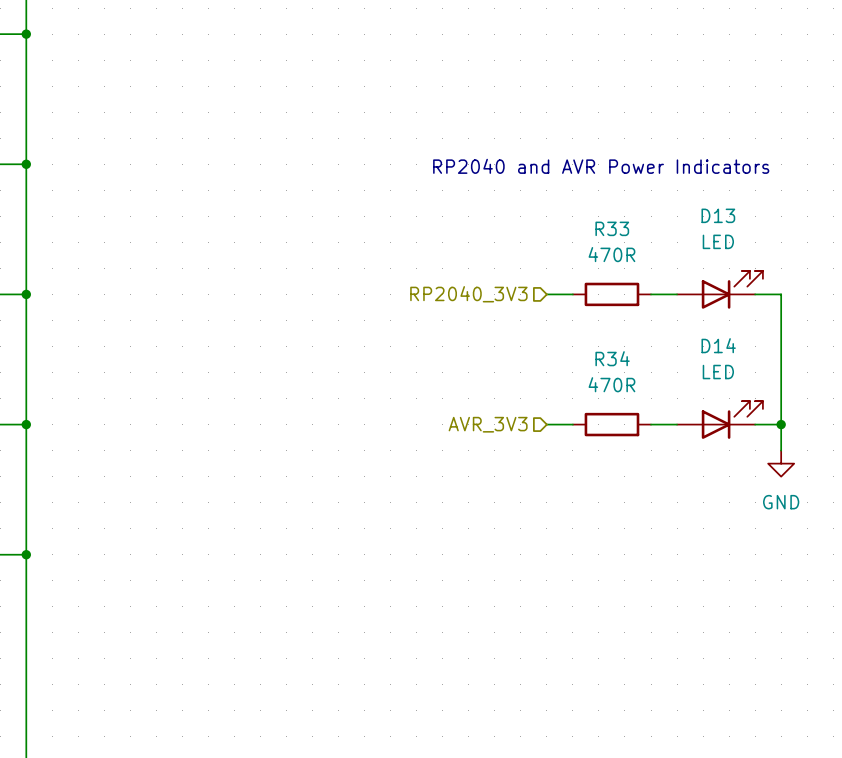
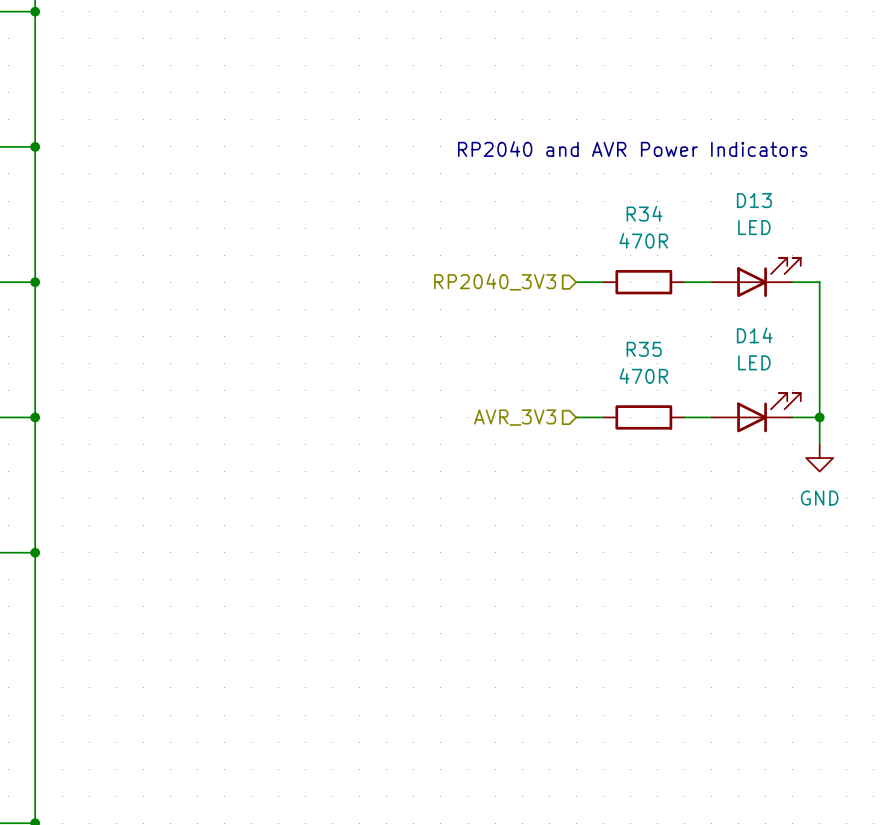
R33 name: R33 (612, 228) -> R34 (644, 213)
R34 name: R34 (612, 358) -> R35 (644, 349)

